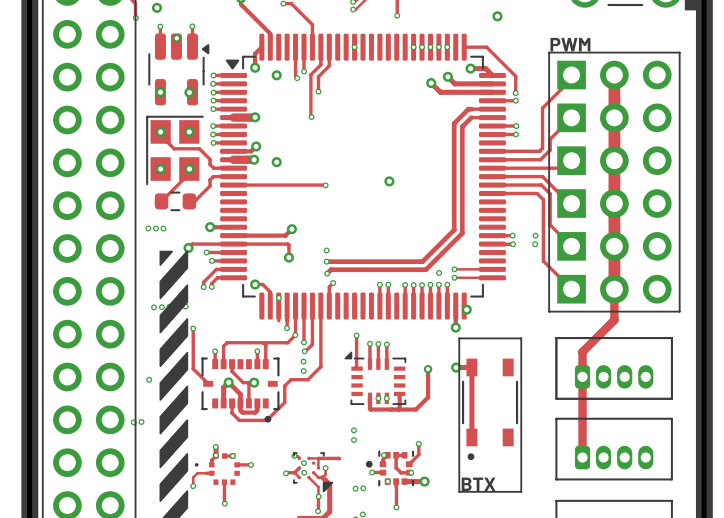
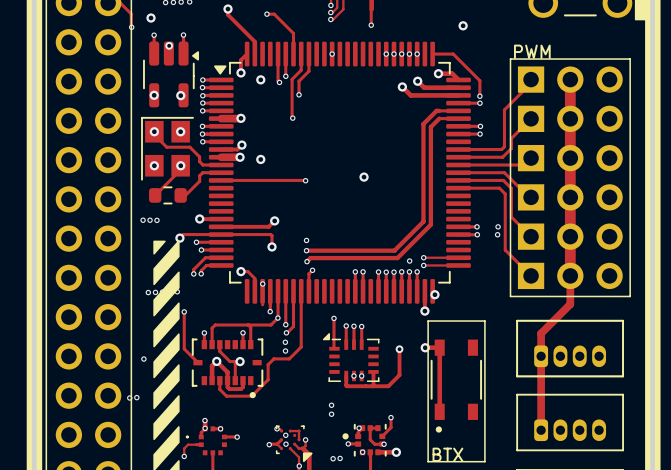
track: (318, 458) (338, 458) -> none

